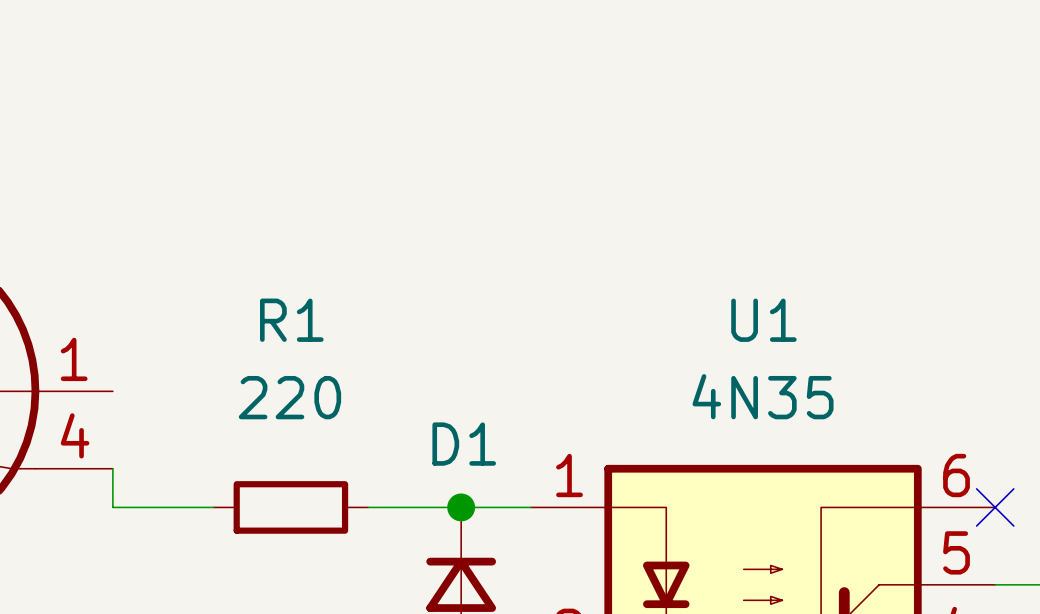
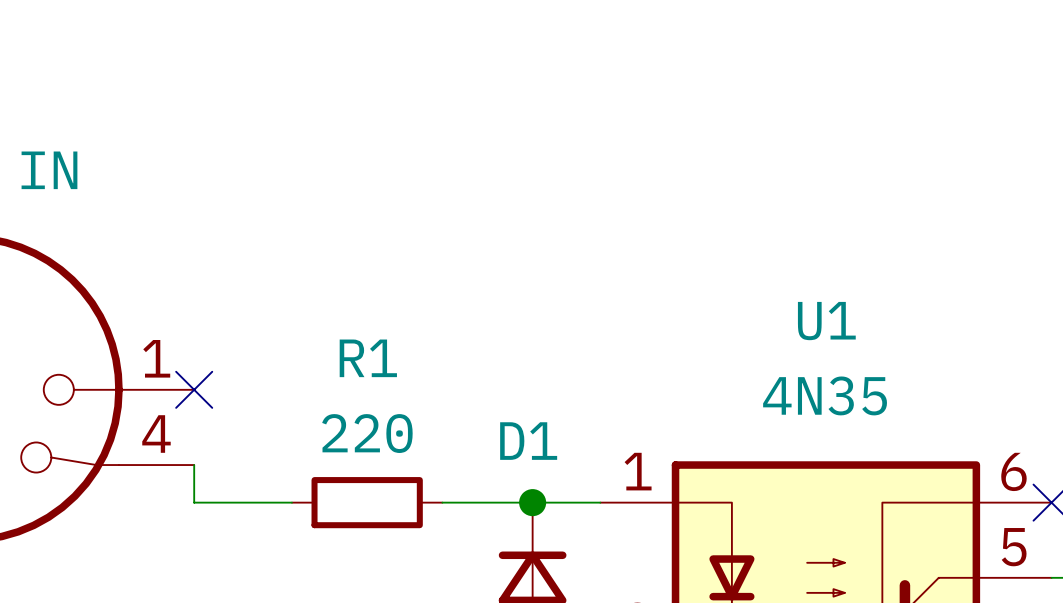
R1 name position: R1 (291, 320) -> R1 (368, 358)
no-connect mark: none -> (194, 389)
R1 value position: 220 (289, 397) -> 220 (367, 433)

